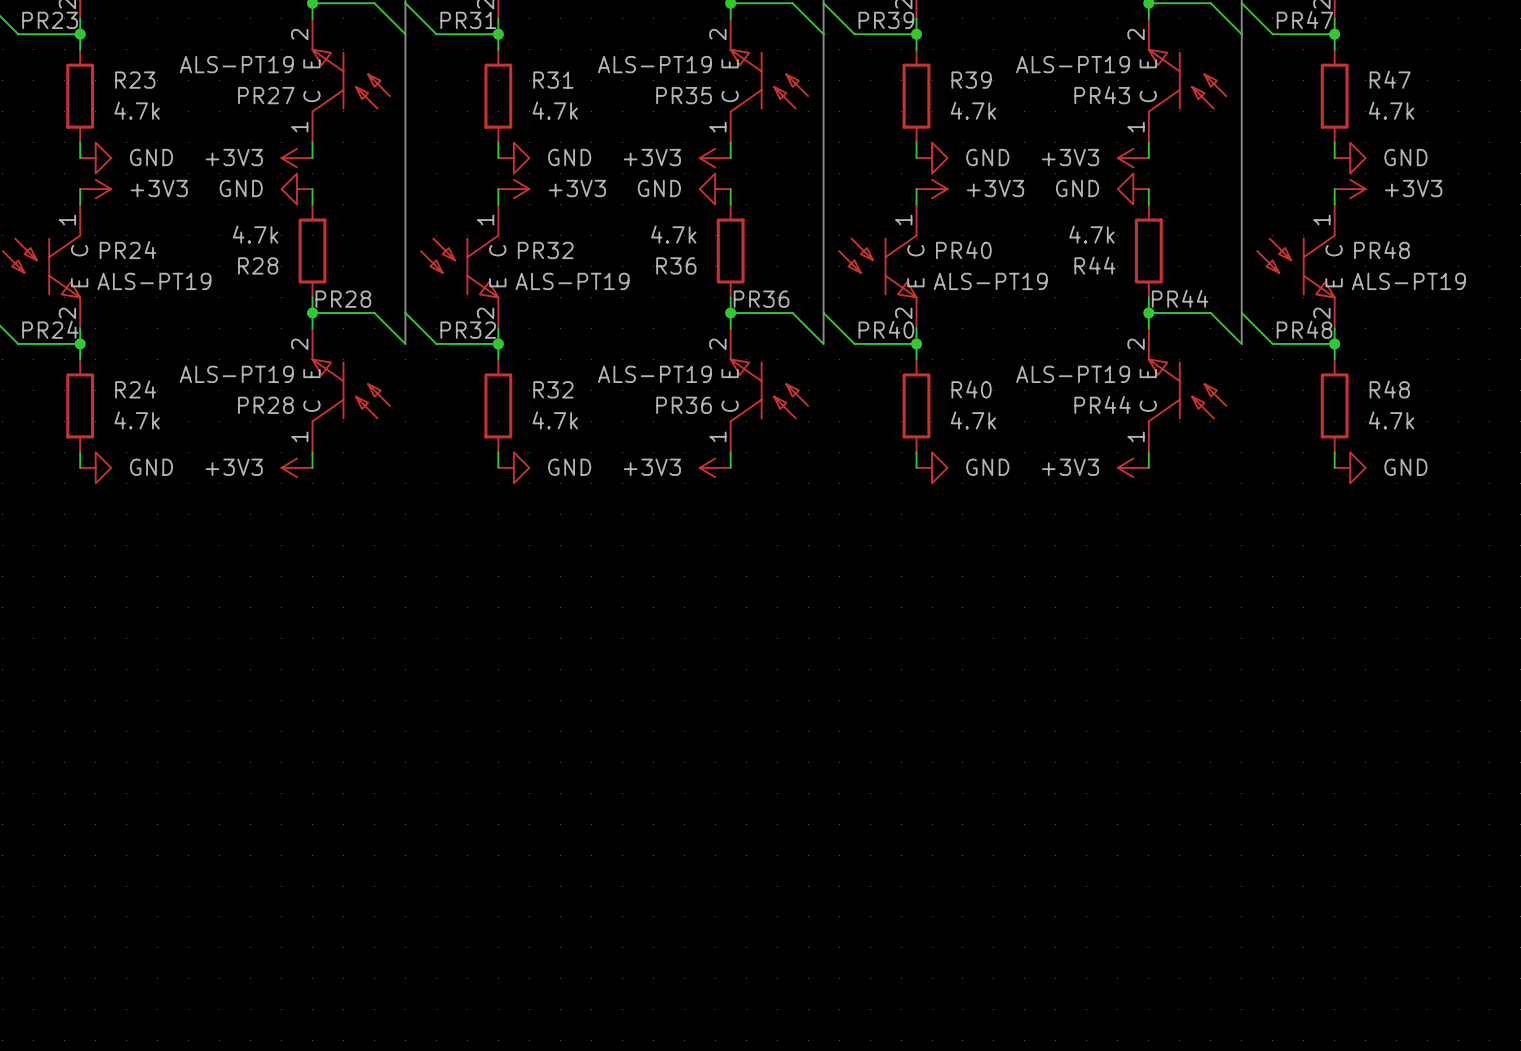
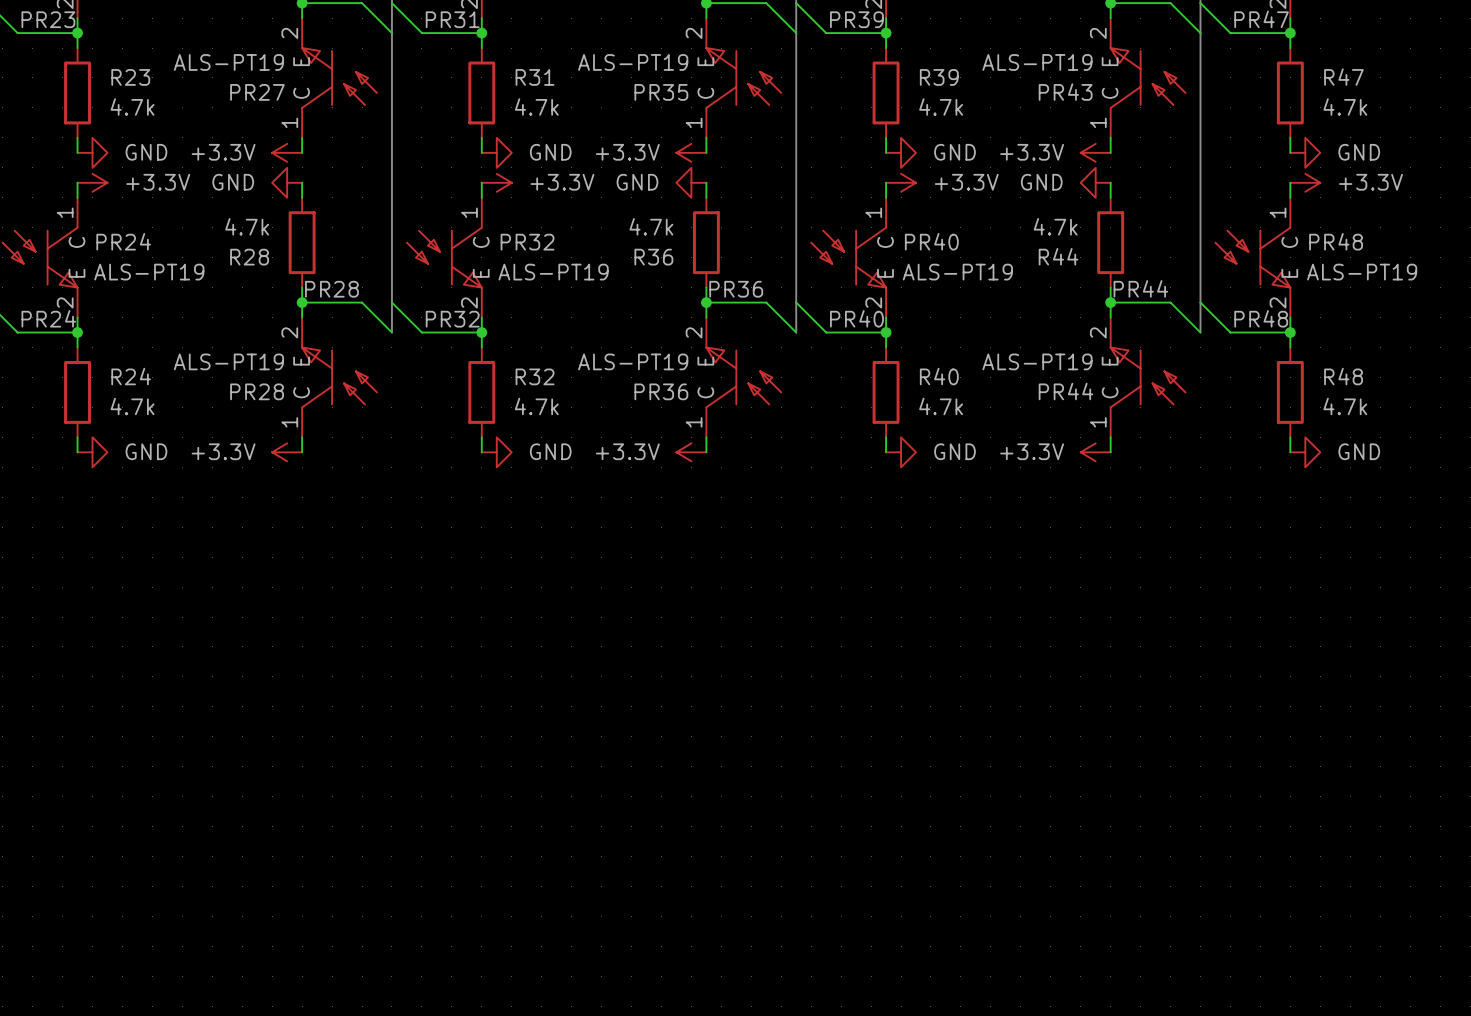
power symbol: +3V3 (297, 158) -> +3.3V (287, 152)
power symbol: +3V3 (715, 158) -> +3.3V (691, 152)
power symbol: +3V3 (1133, 158) -> +3.3V (1095, 152)
power symbol: +3V3 (95, 189) -> +3.3V (92, 182)
power symbol: +3V3 (513, 189) -> +3.3V (496, 182)
power symbol: +3V3 (932, 189) -> +3.3V (901, 182)
power symbol: +3V3 (1350, 189) -> +3.3V (1305, 182)
power symbol: +3V3 (297, 467) -> +3.3V (287, 452)
power symbol: +3V3 (715, 467) -> +3.3V (691, 452)
power symbol: +3V3 (1133, 467) -> +3.3V (1095, 452)

